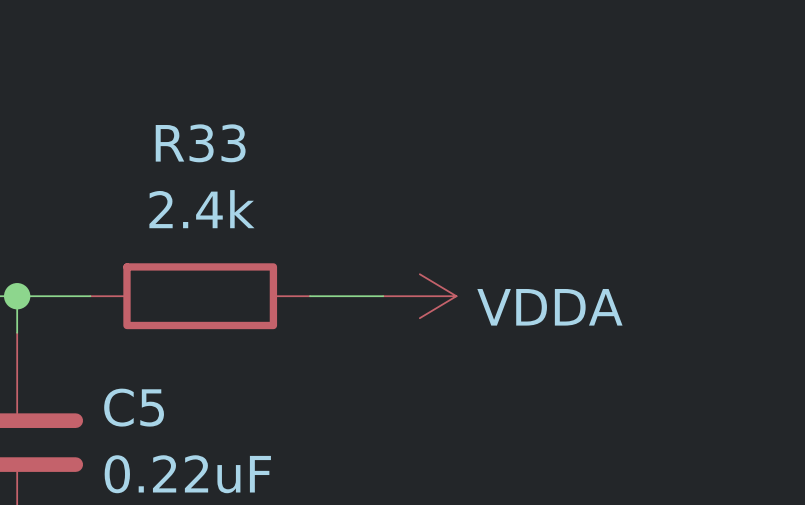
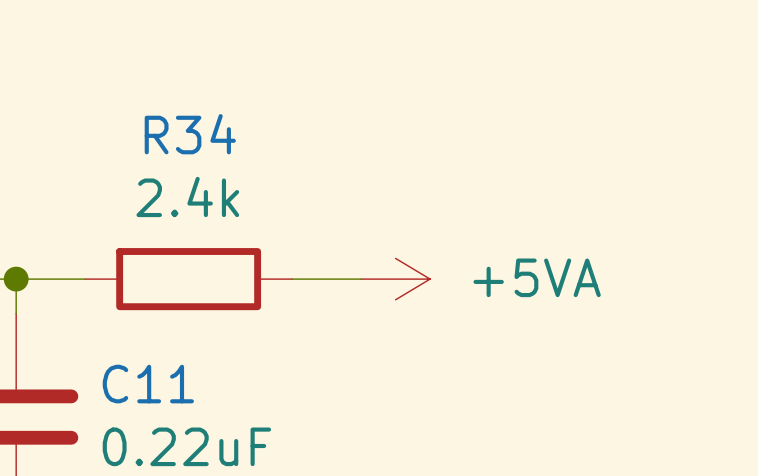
R33 name: R33 (200, 143) -> R34 (190, 134)
power symbol: VDDA (419, 296) -> +5VA (395, 279)
C5 name: C5 (134, 407) -> C11 (148, 384)

